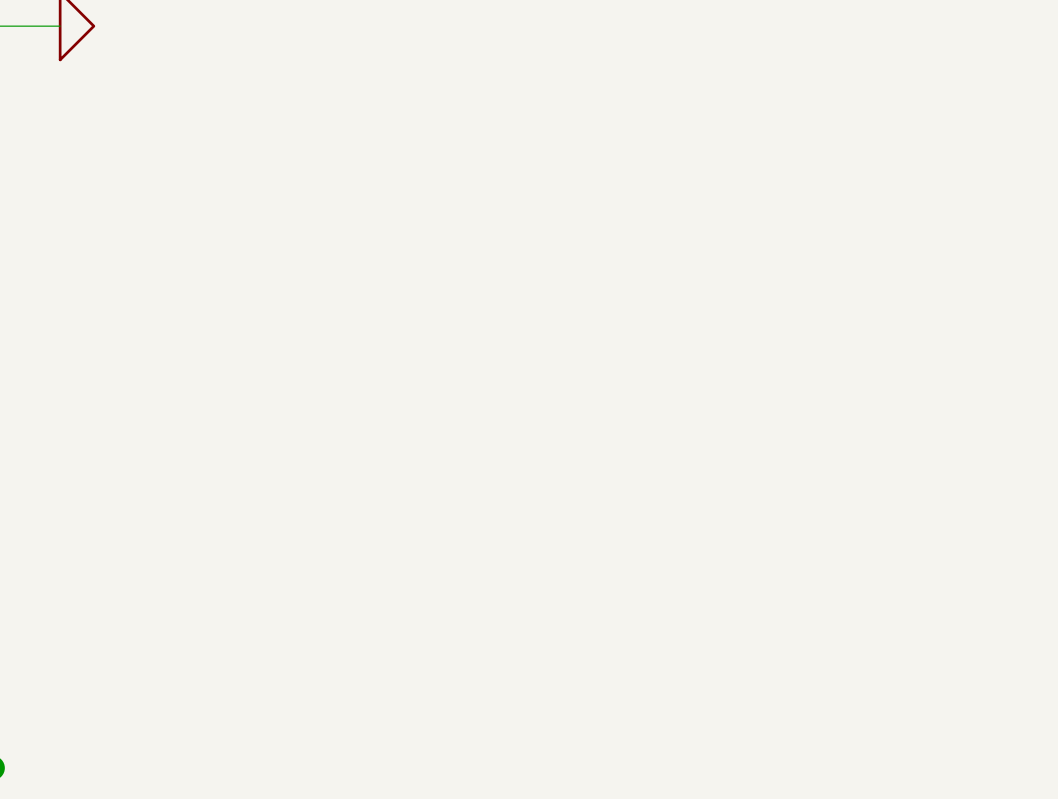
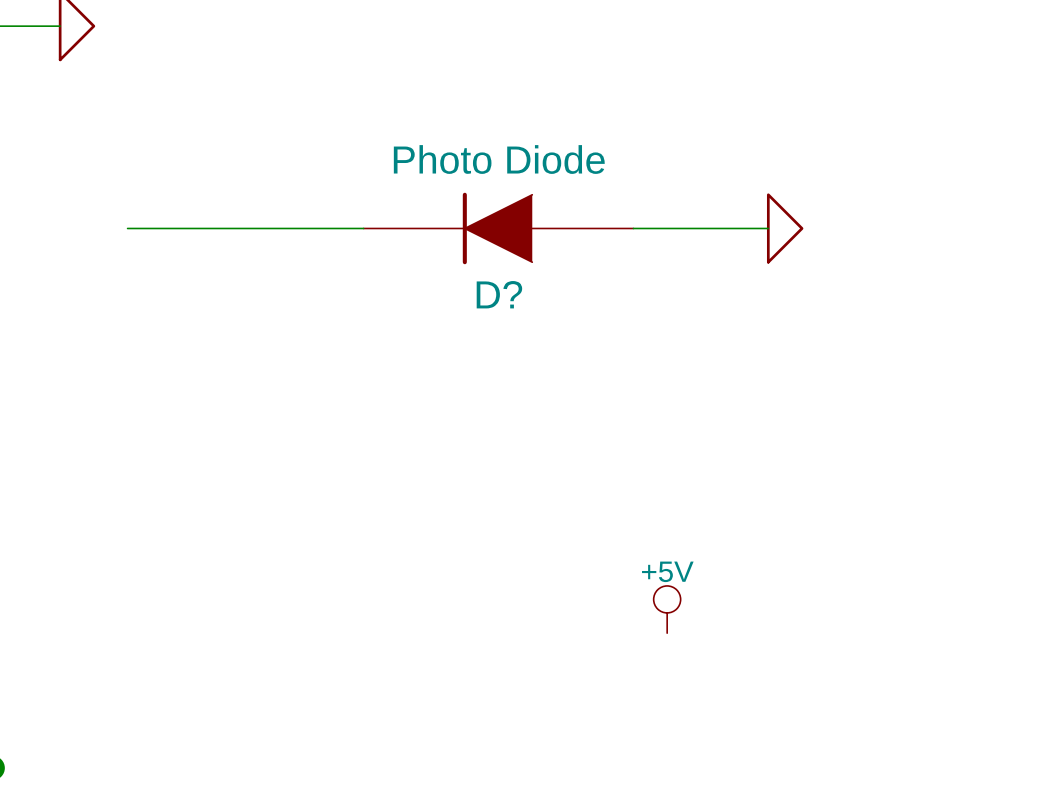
wire: none -> (127, 228) (363, 228)
D?: none -> Photo Diode (498, 228)
wire: none -> (633, 228) (768, 228)
power symbol: none -> (785, 228)
power symbol: none -> +5V (667, 609)

